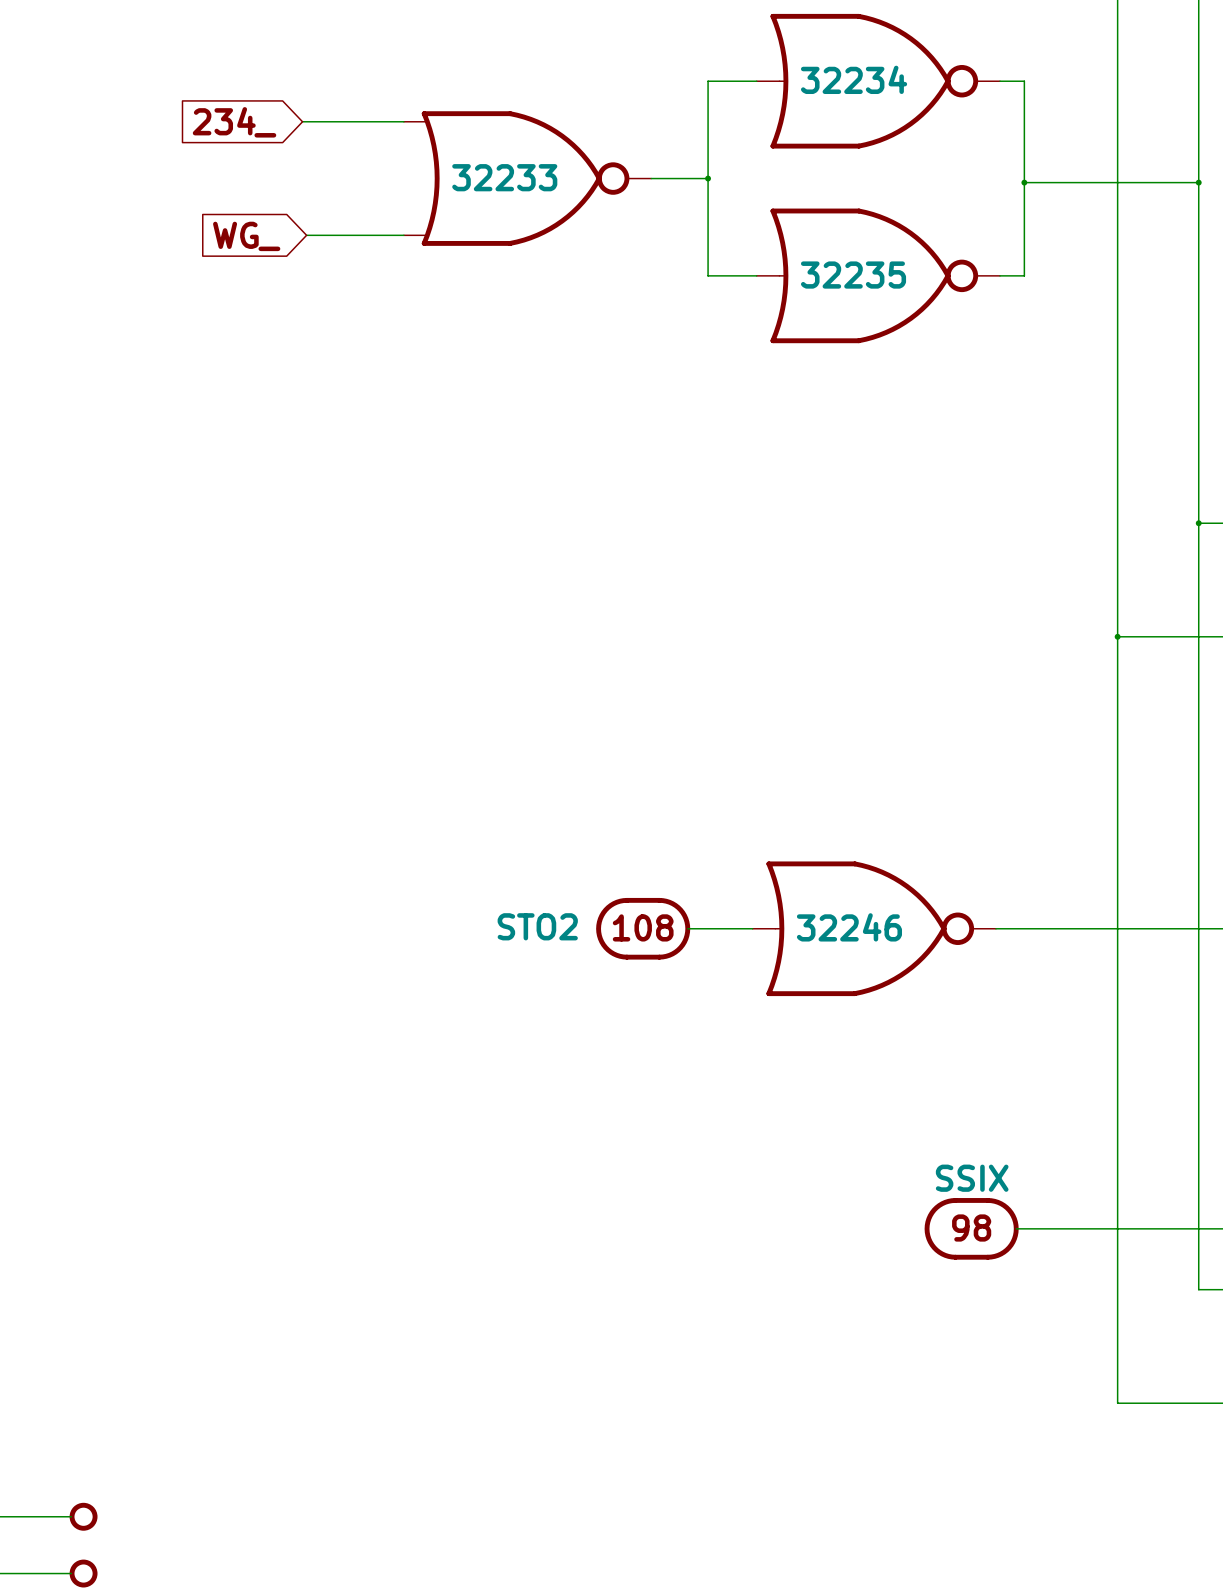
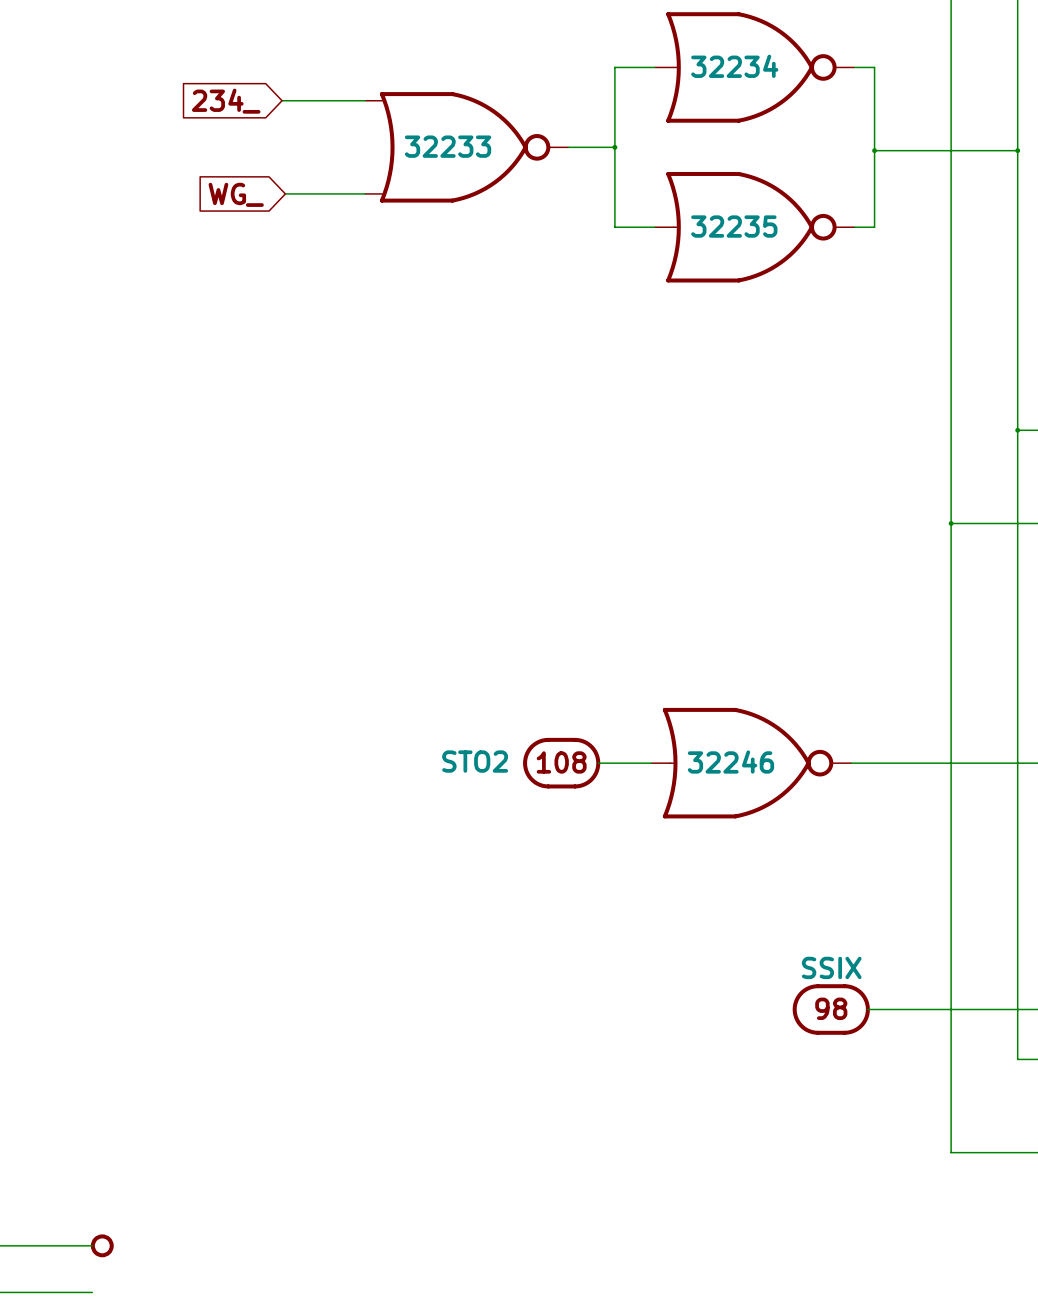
part: (83, 1573) -> none

